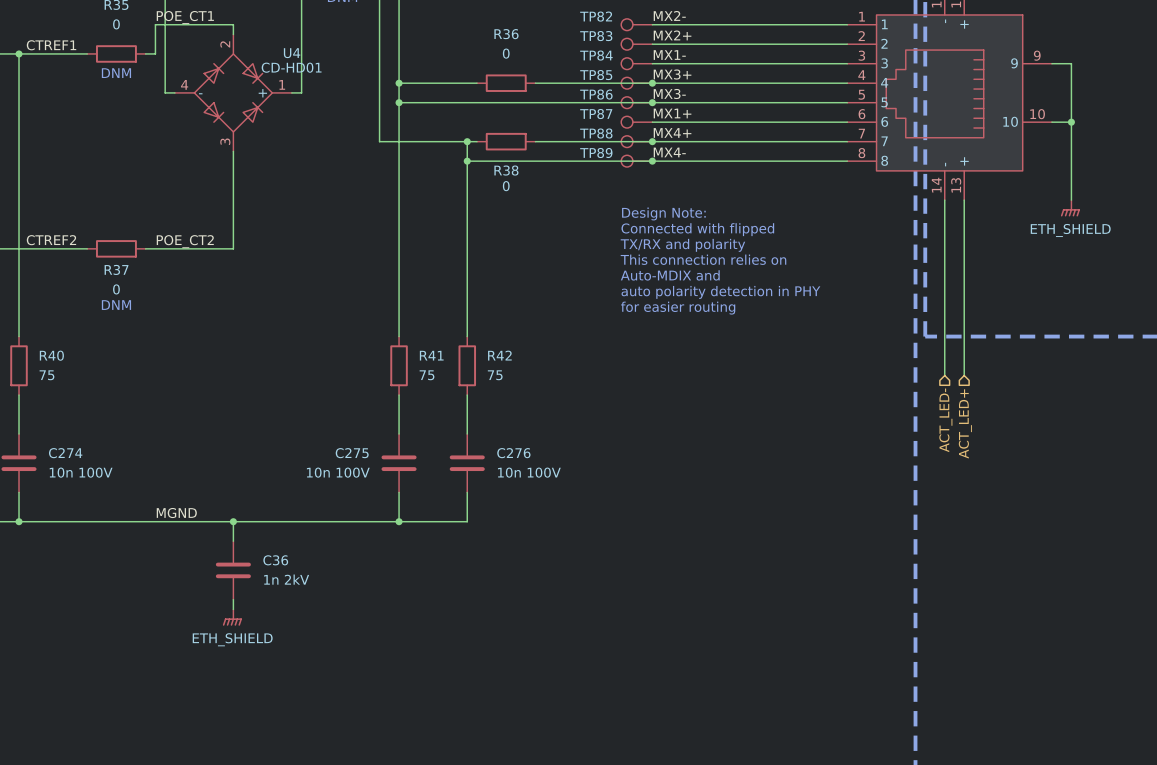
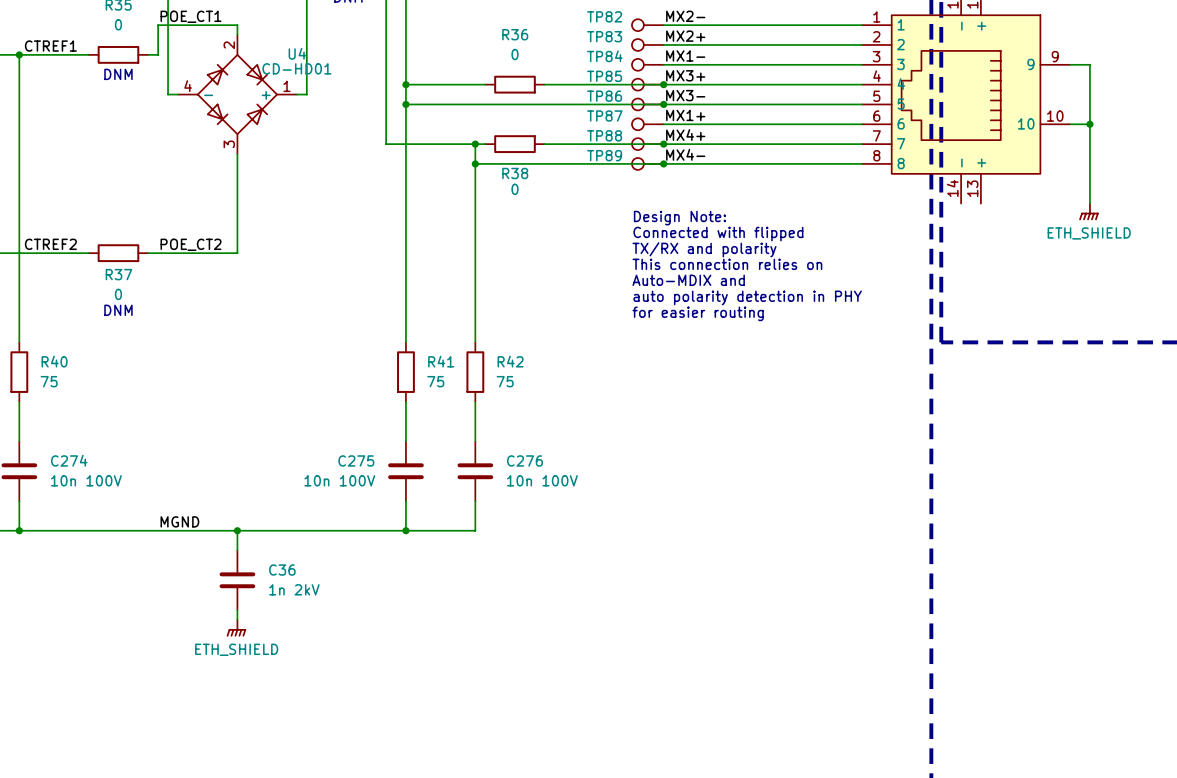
wire: (944, 200) (944, 375) -> none
wire: (964, 200) (964, 375) -> none
hierarchical label: ACT_LED- (945, 420) -> none
hierarchical label: ACT_LED+ (965, 423) -> none

